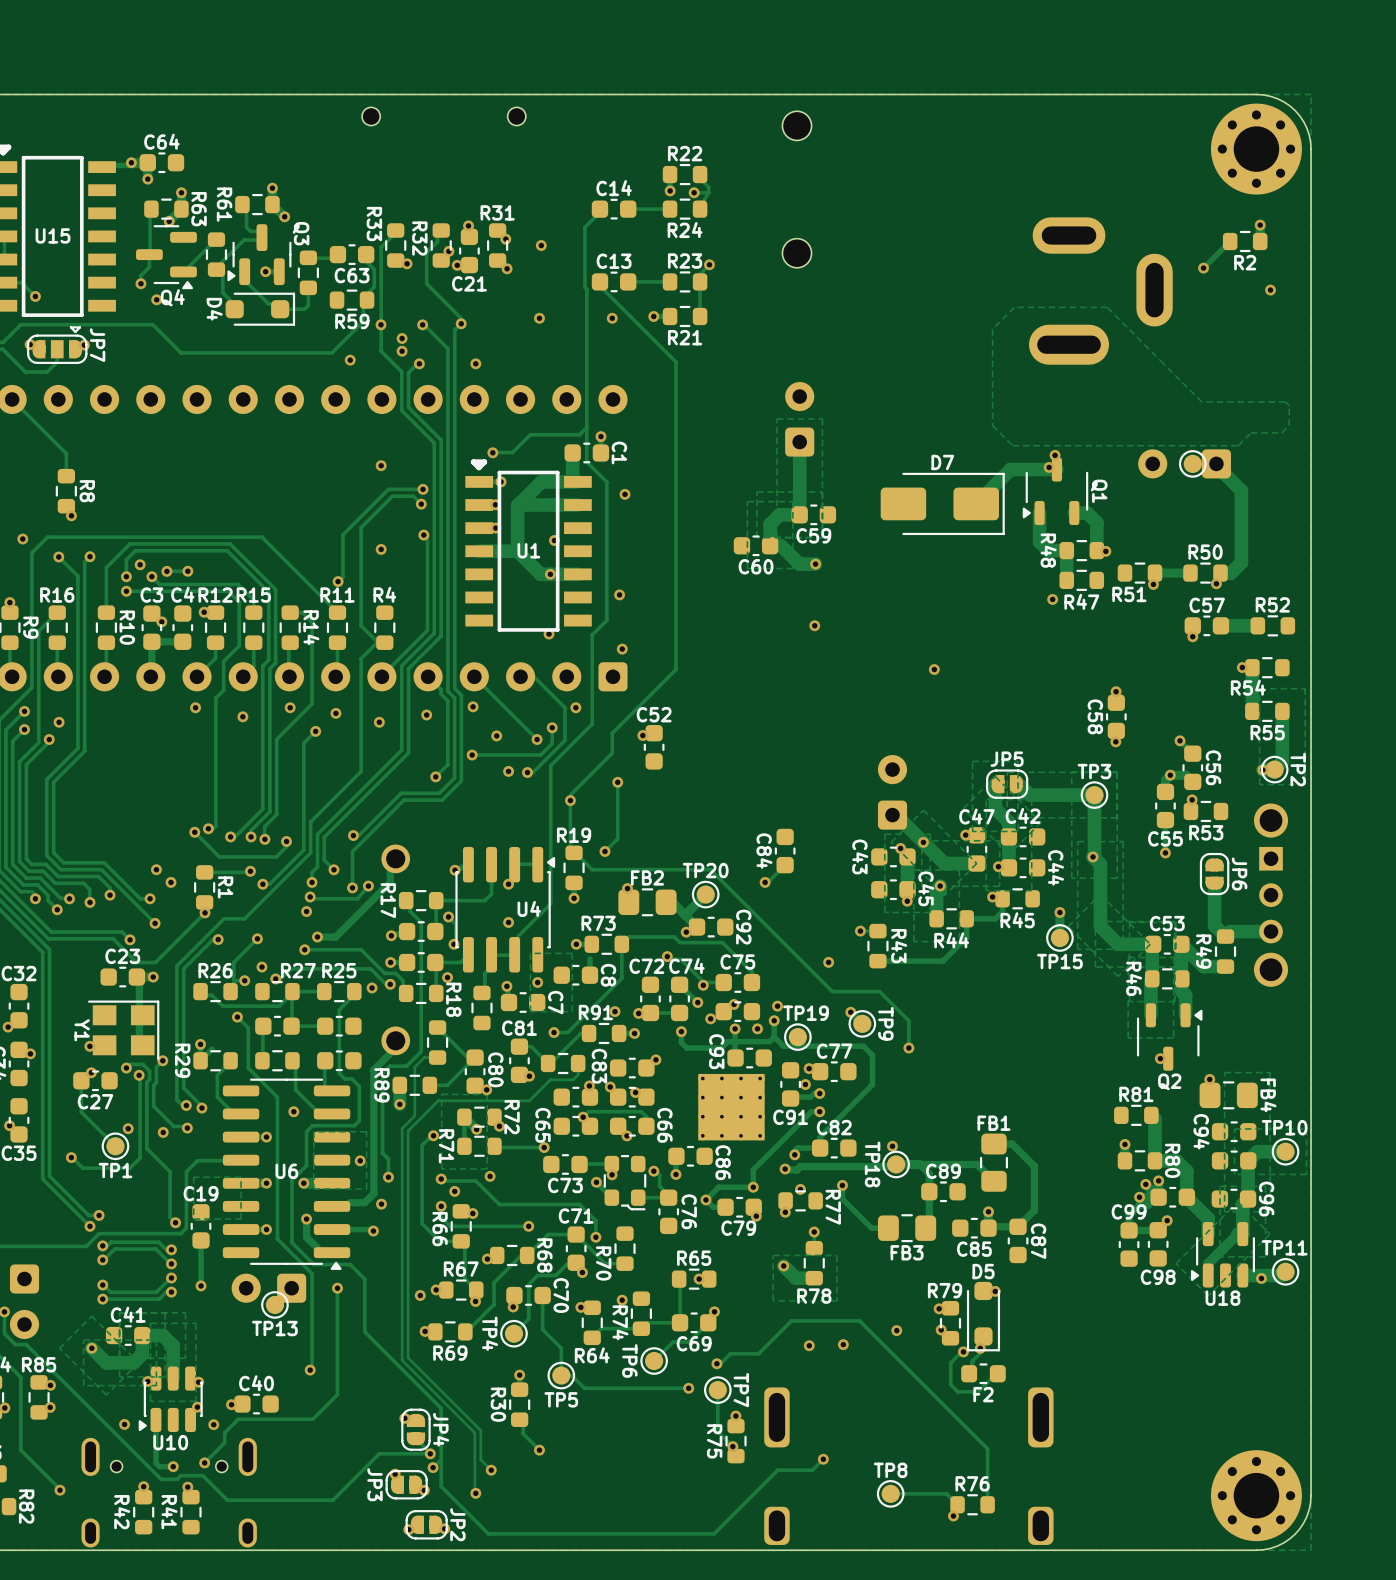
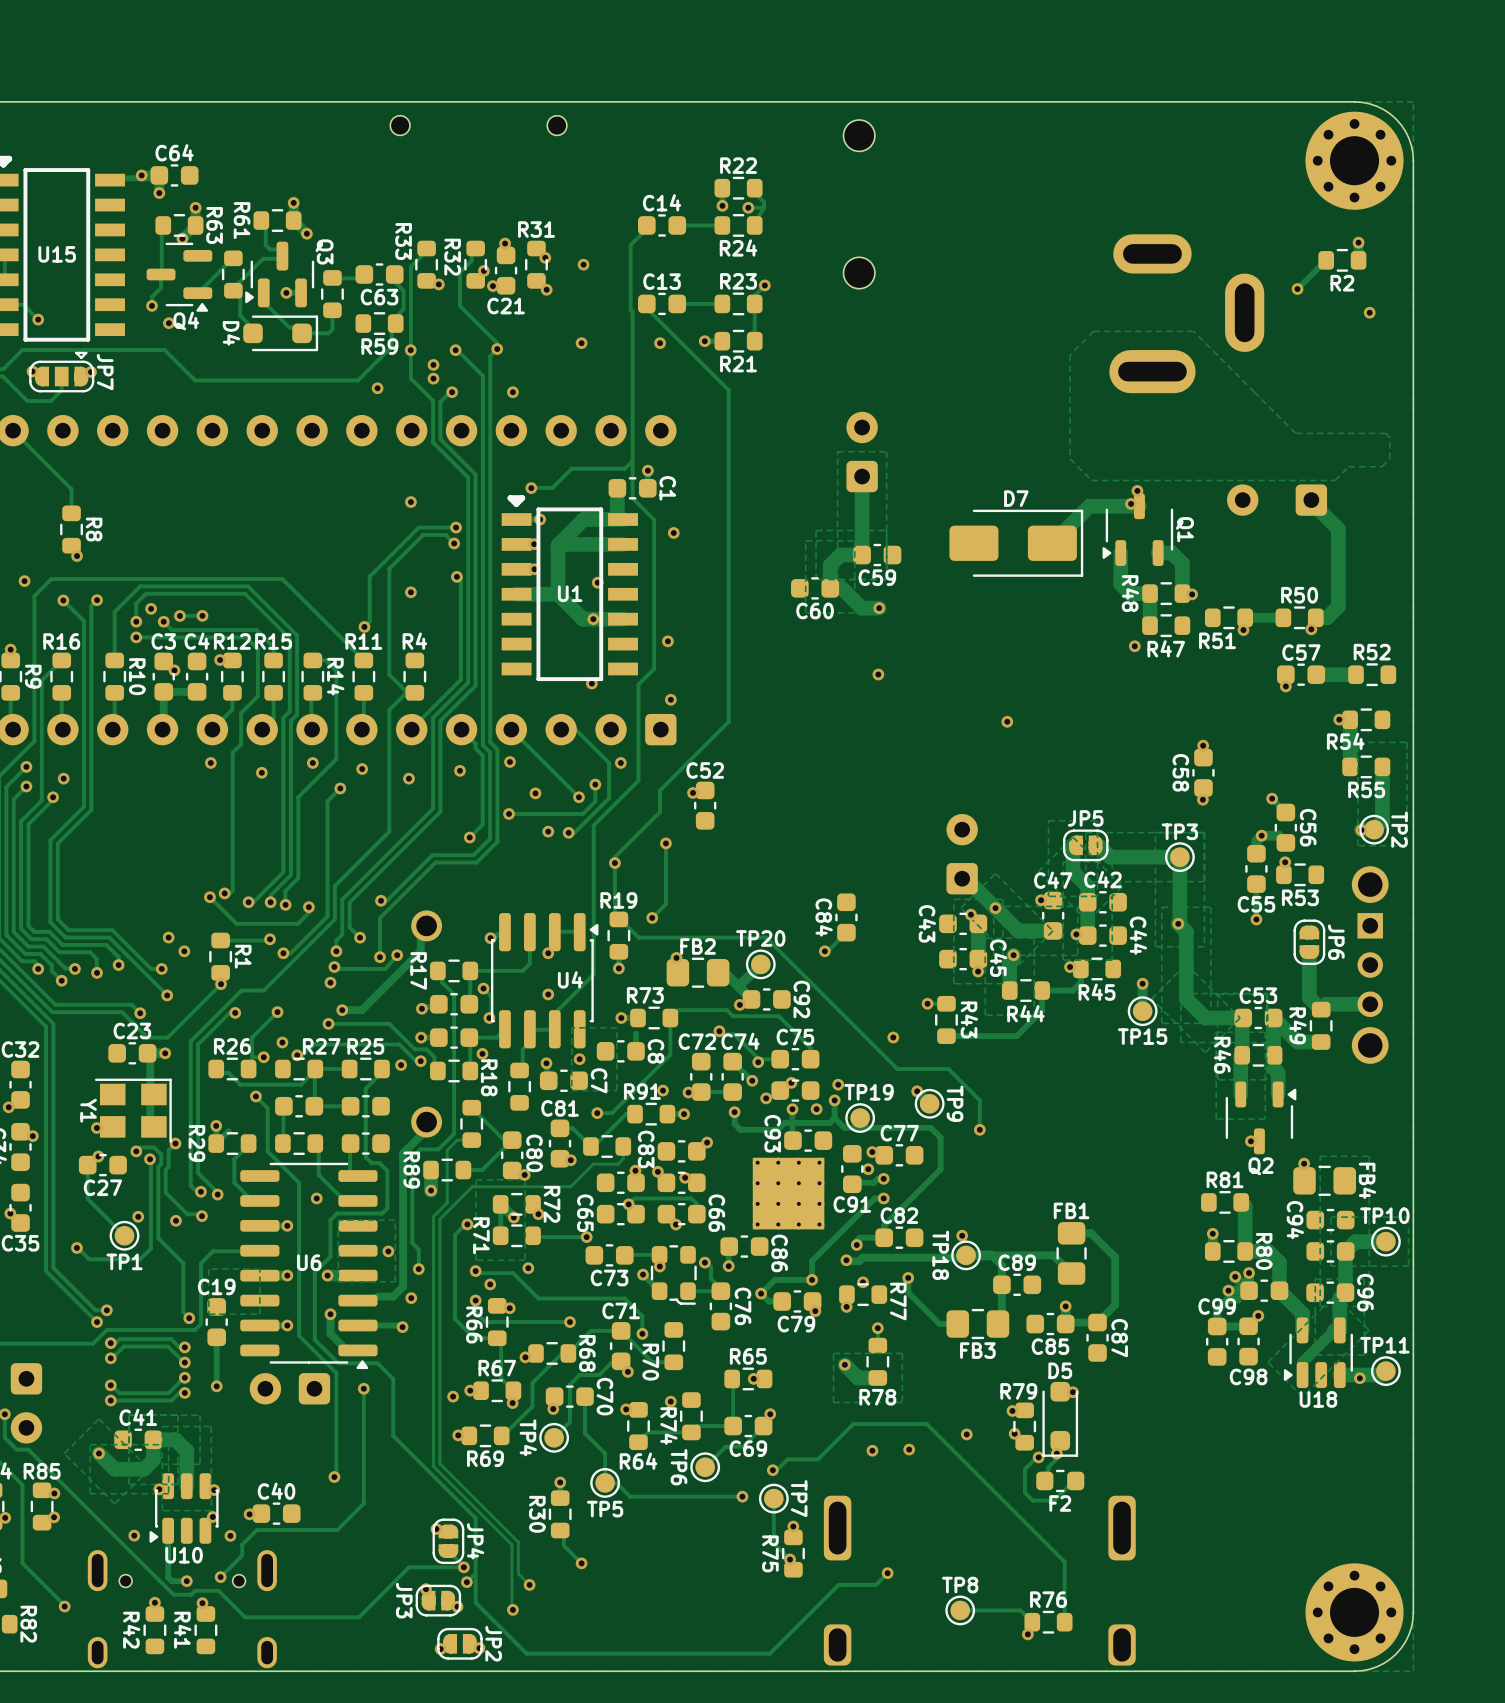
part: (1192, 463) -> none
TP13: (274, 1304) -> none

